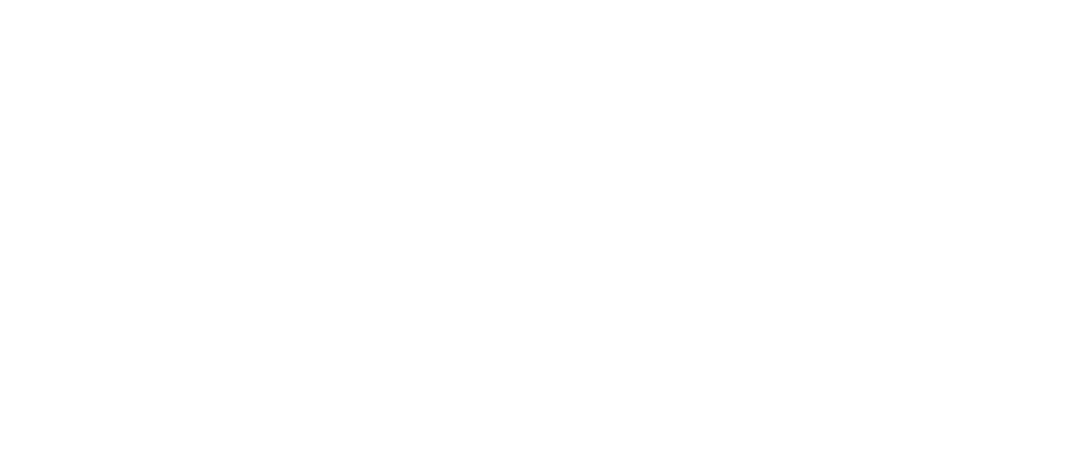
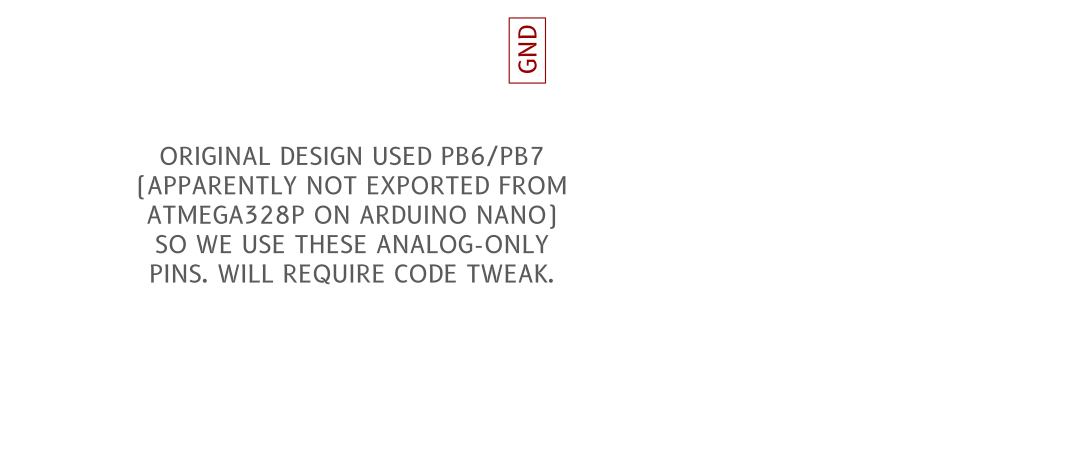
global label: none -> GND (527, 49)
text: none -> ORIGINAL DESIGN USED PB6/PB7 (351, 155)
text: none -> (APPARENTLY NOT EXPORTED FROM (352, 187)
text: none -> ATMEGA328P ON ARDUINO NANO) (351, 216)
text: none -> SO WE USE THESE ANALOG-ONLY (352, 244)
text: none -> PINS. WILL REQUIRE CODE TWEAK. (351, 274)

